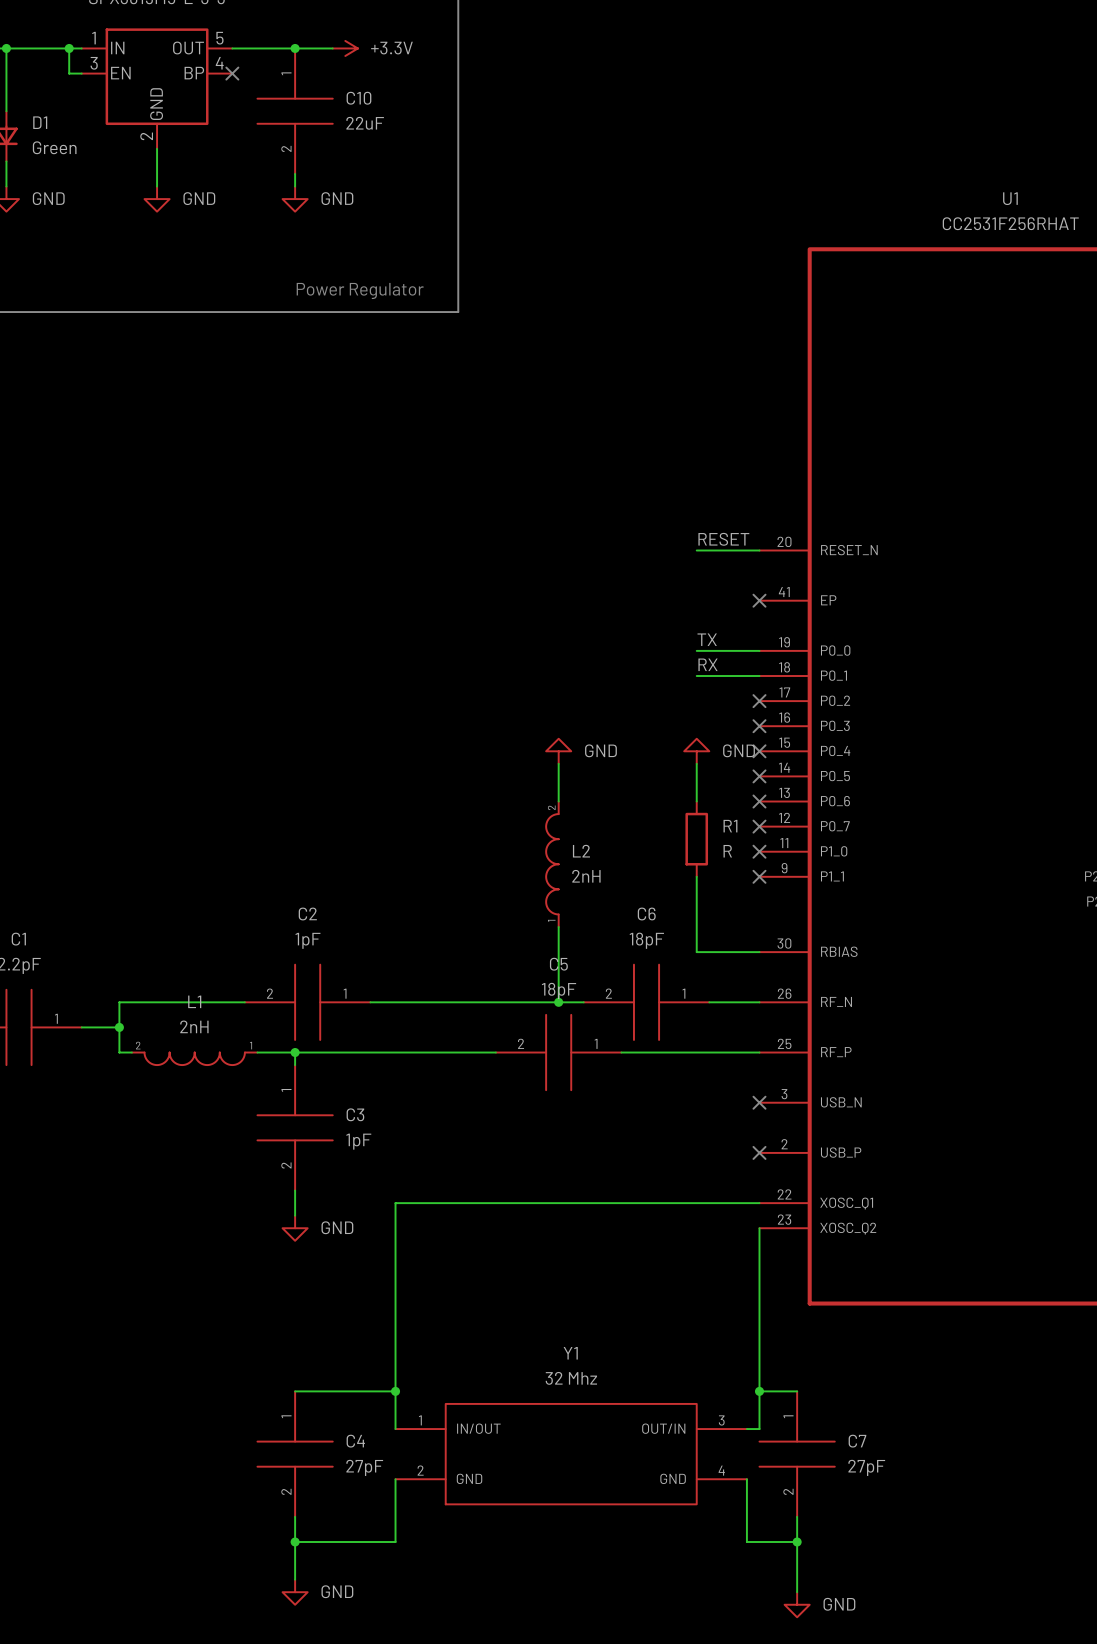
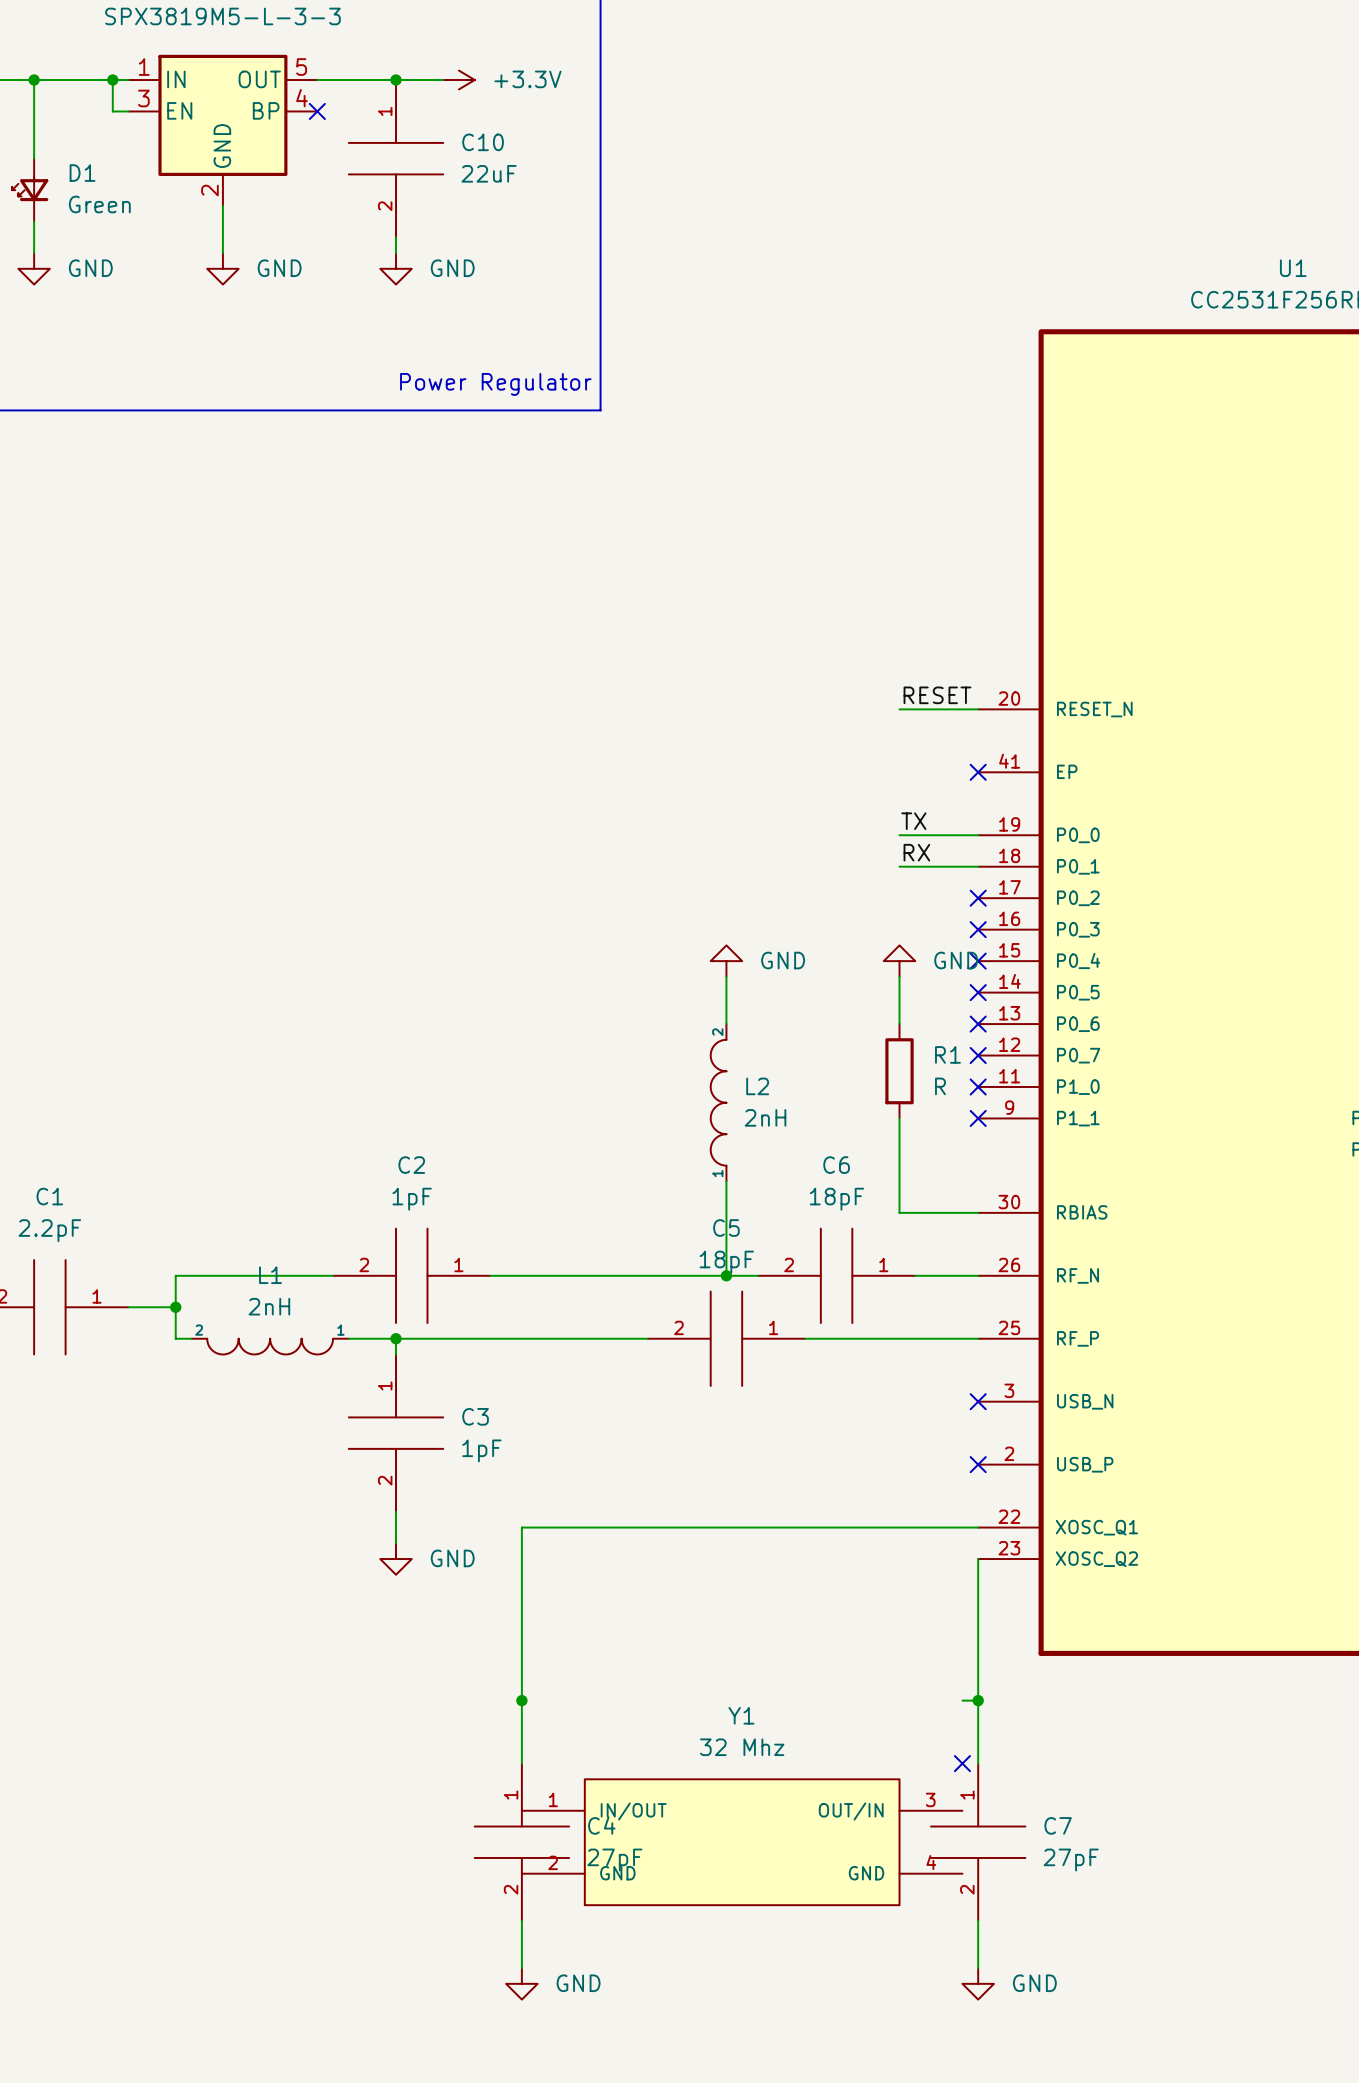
wire: none -> (962, 1700) (978, 1700)
wire: (295, 1391) (395, 1391) (395, 1429) -> none
junction position: (395, 1391) -> (521, 1700)
no-connect mark: none -> (962, 1763)
junction position: (759, 1391) -> (978, 1700)
wire: (797, 1391) (759, 1391) (759, 1429) (746, 1429) -> none
C4 position: (295, 1454) -> (521, 1842)
C7 position: (797, 1454) -> (978, 1842)
wire: (746, 1479) (746, 1542) (797, 1542) -> none
wire: (295, 1516) (295, 1579) -> none
wire: none -> (978, 1920) (978, 1968)
wire: (797, 1516) (797, 1592) -> none
wire: (295, 1542) (395, 1542) -> (521, 1968) (521, 1952)
junction: (295, 1542) -> none
junction: (797, 1542) -> none
power symbol position: GND (295, 1592) -> GND (521, 1983)
power symbol position: GND (797, 1604) -> GND (978, 1983)

